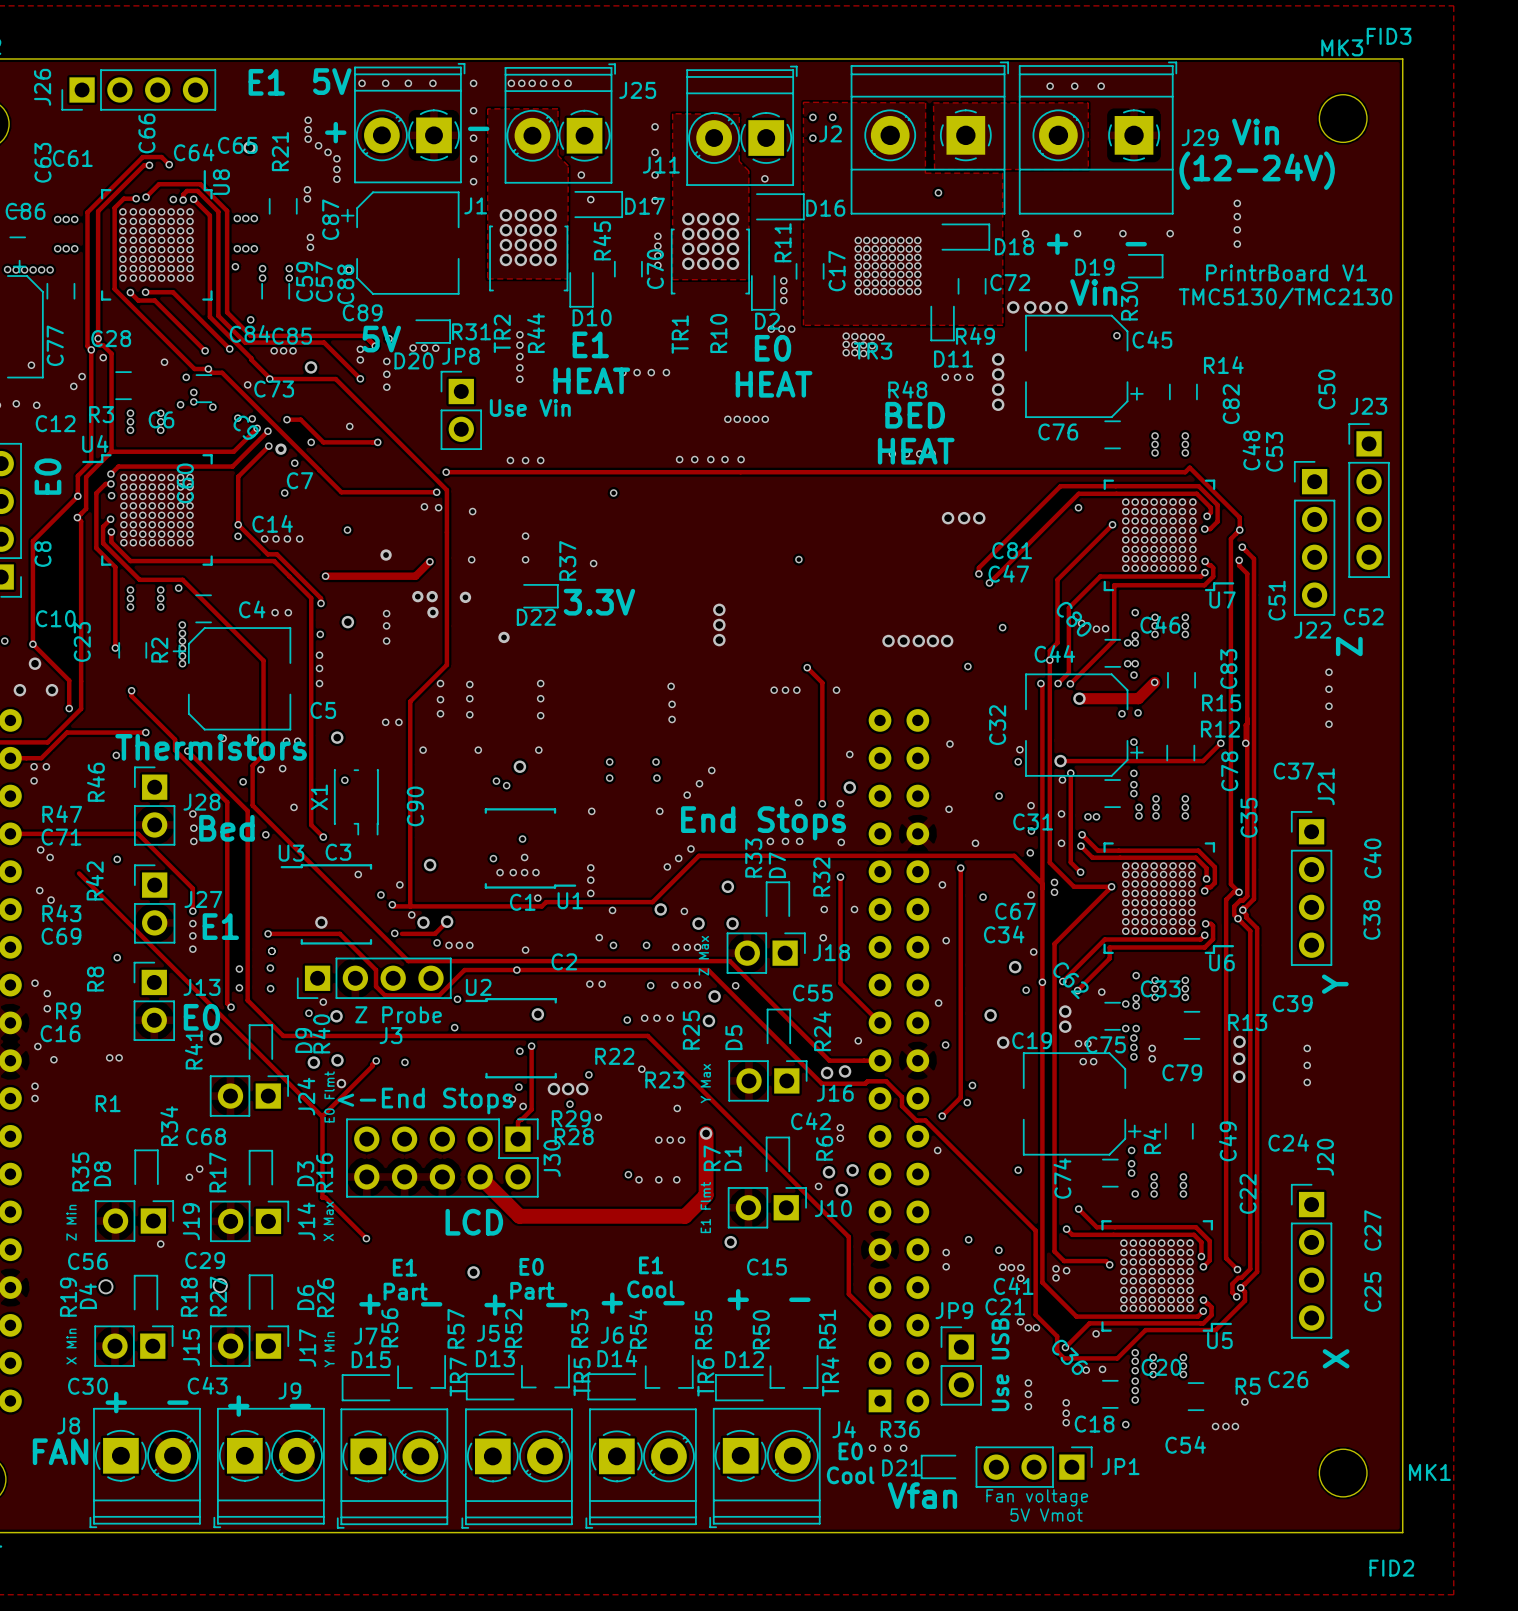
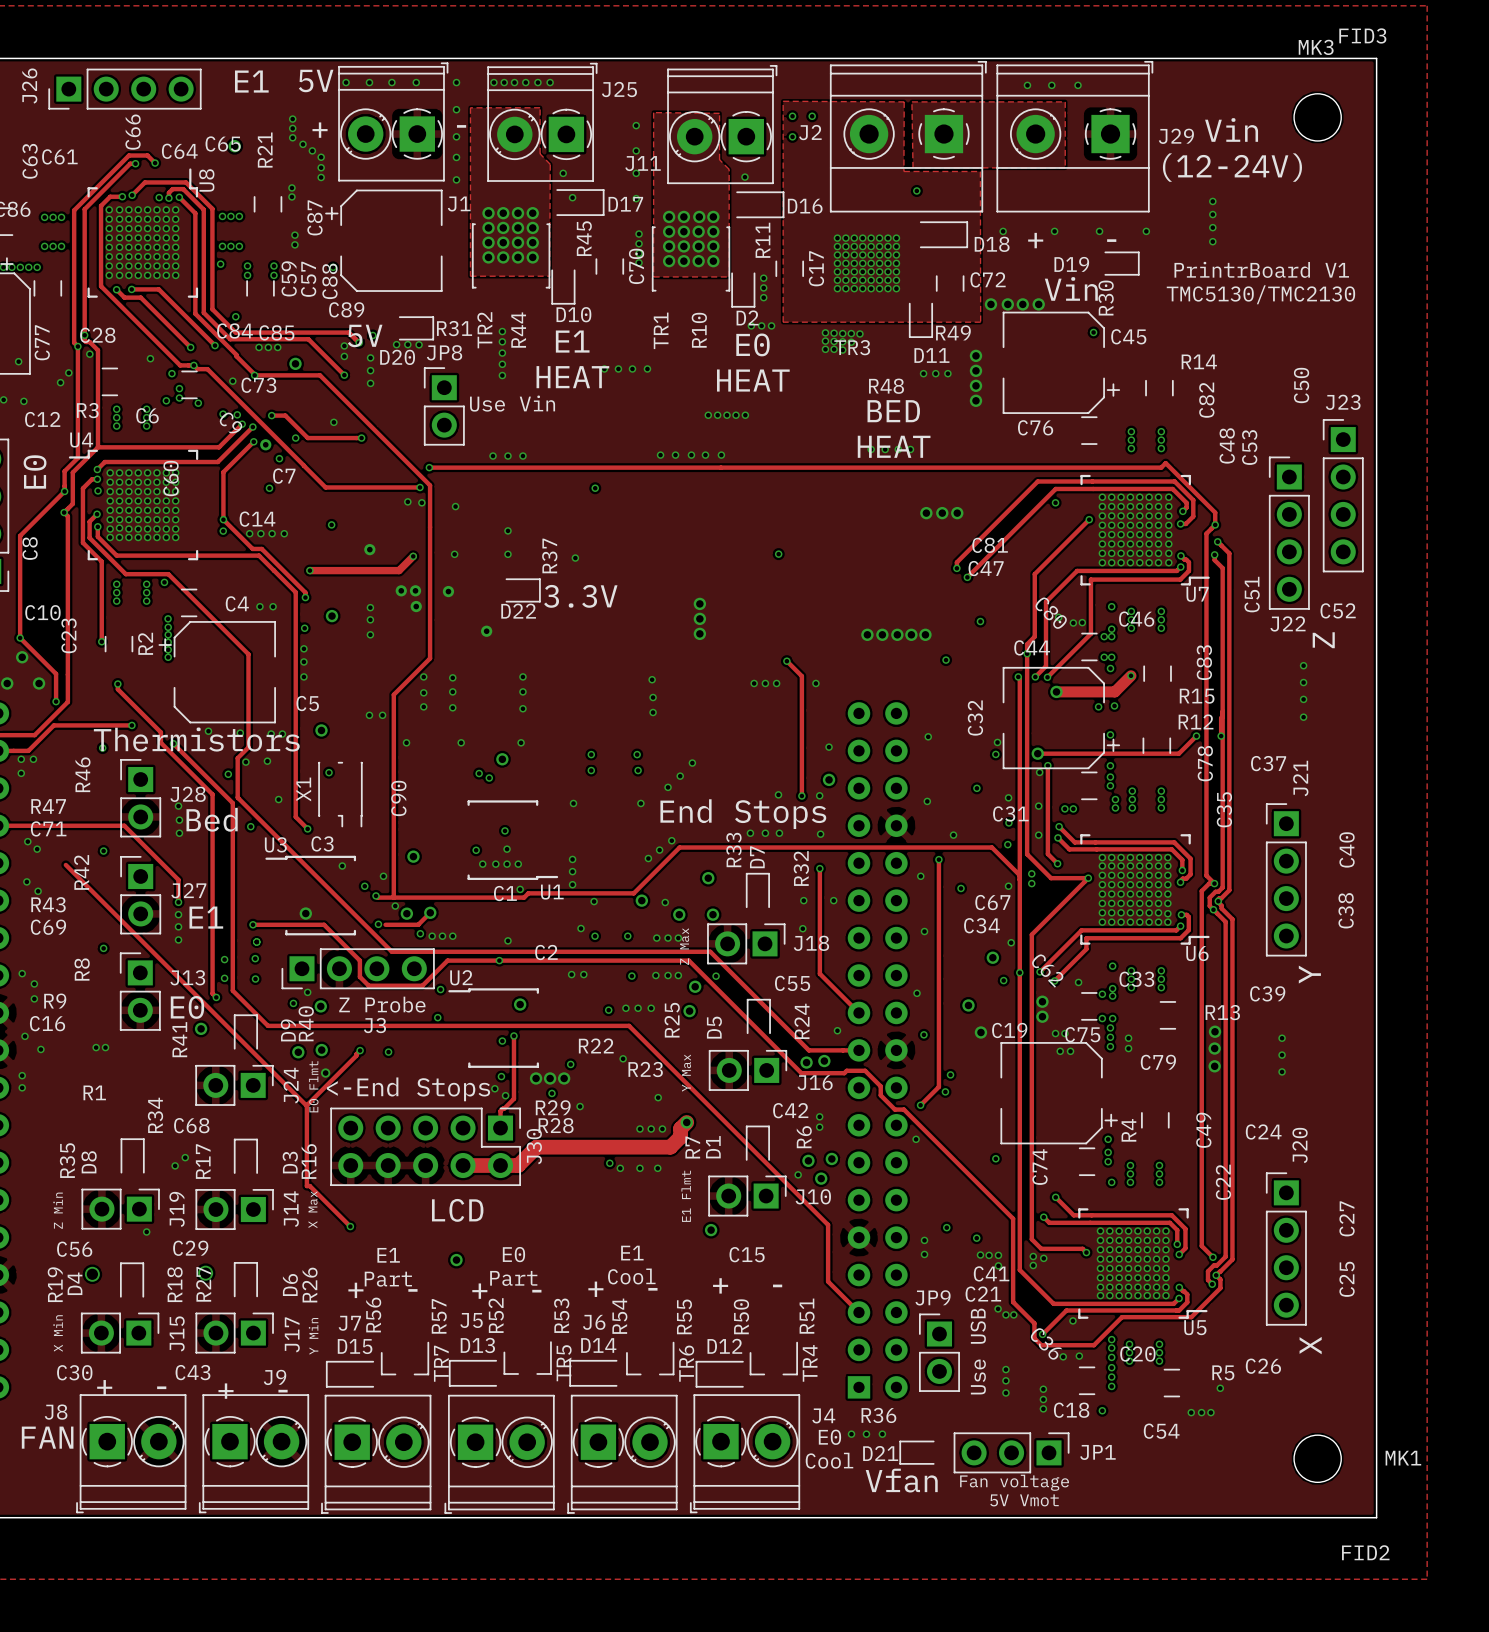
track: (706, 1133) (706, 1195) (685, 1216) (519, 1216) (480, 1176) -> (686, 1122) (680, 1128) (680, 1137) (670, 1147) (536, 1147) (518, 1165) (463, 1165)

